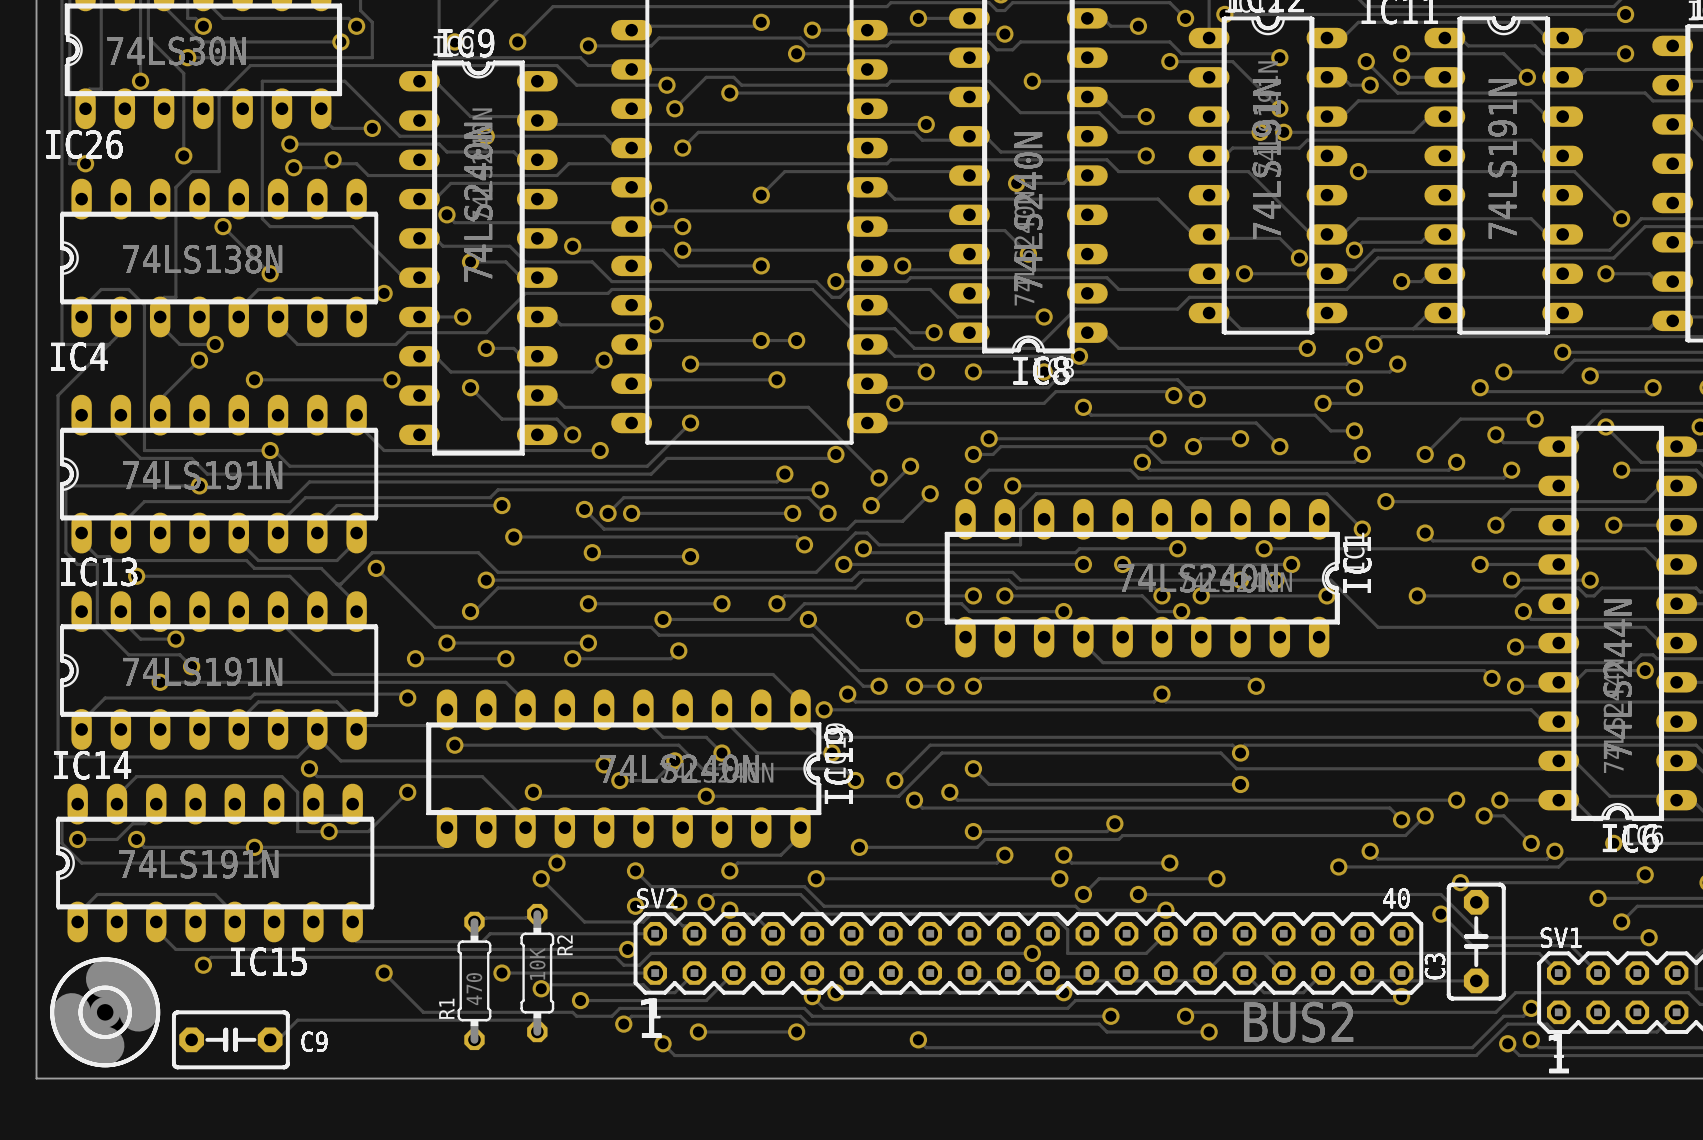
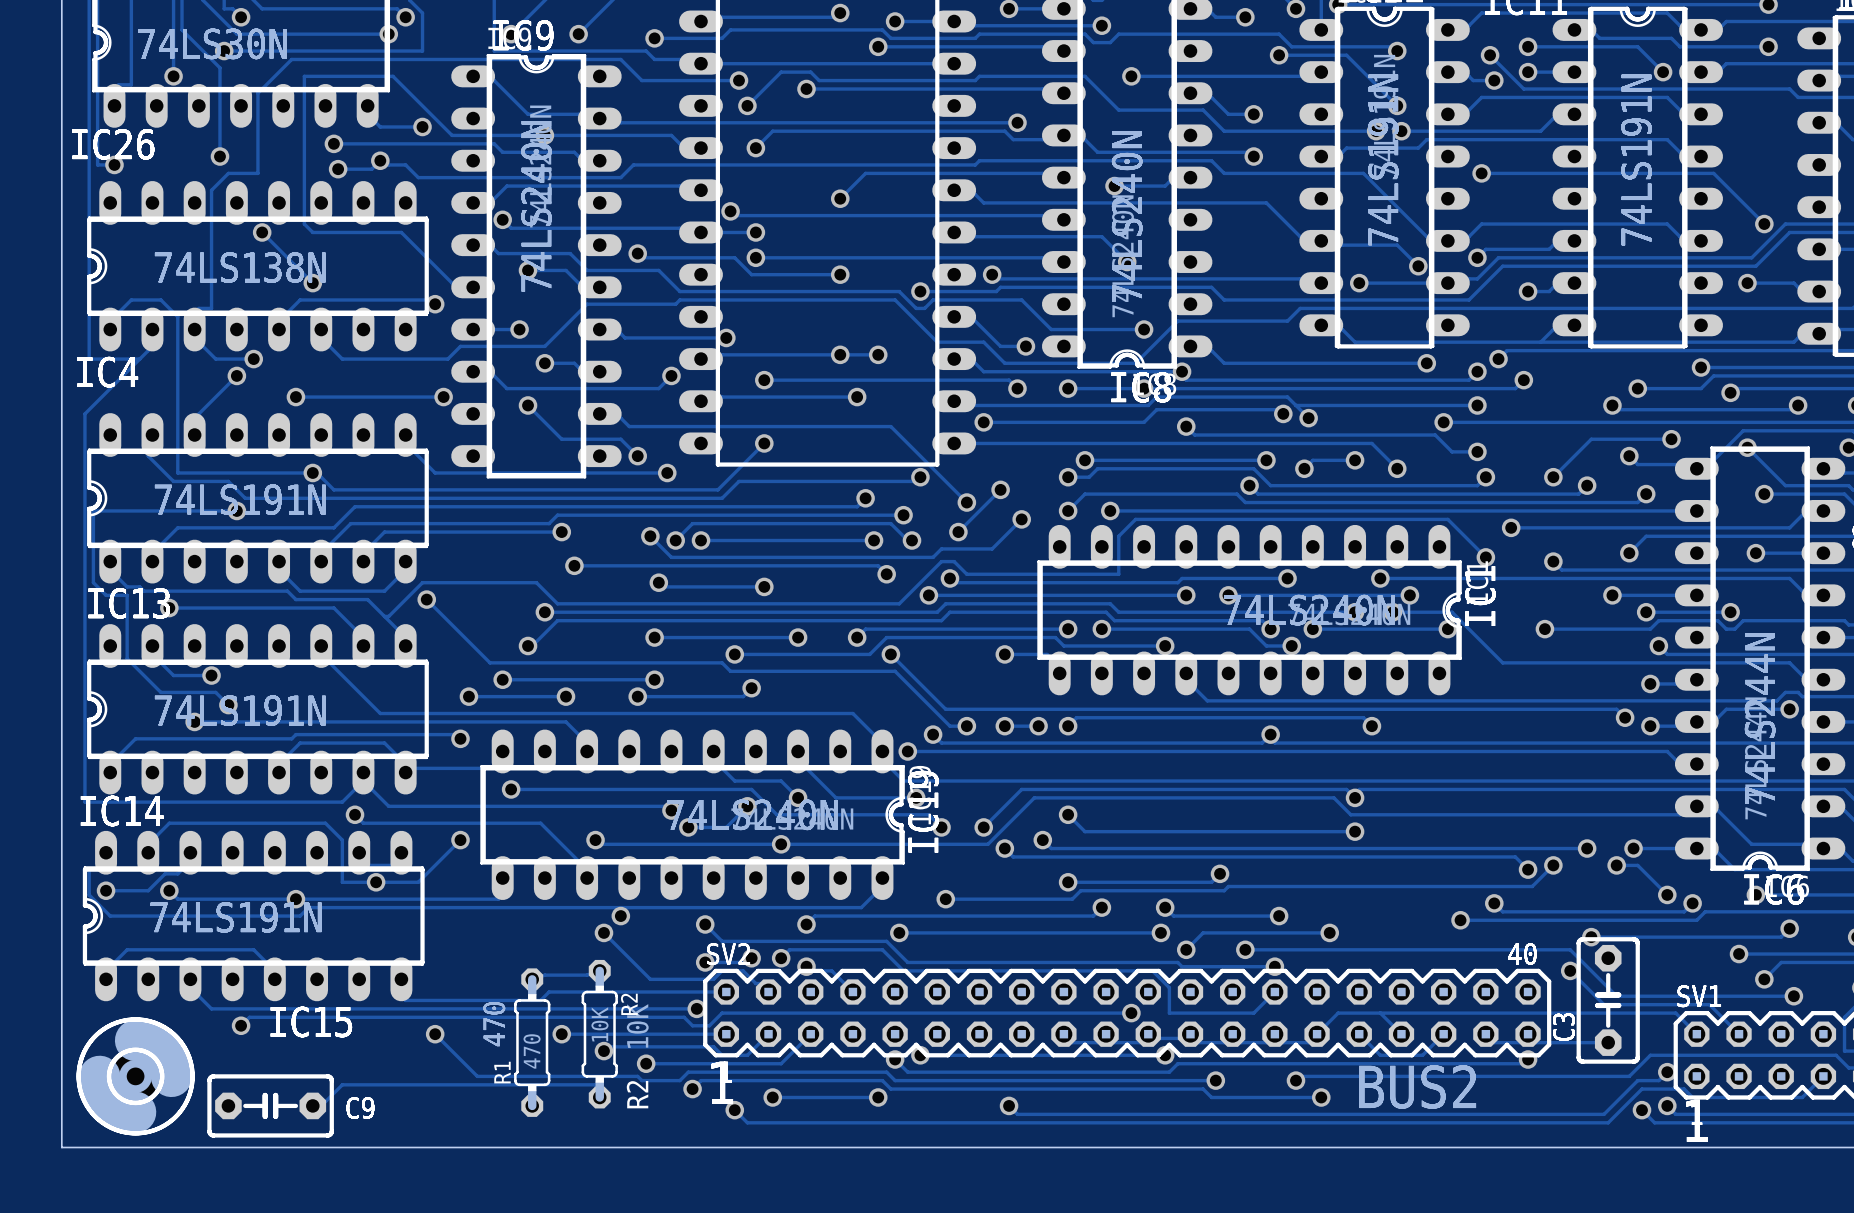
text: none -> 470 (494, 1024)
text: none -> 10K (637, 1026)
text: none -> R2 (637, 1094)

